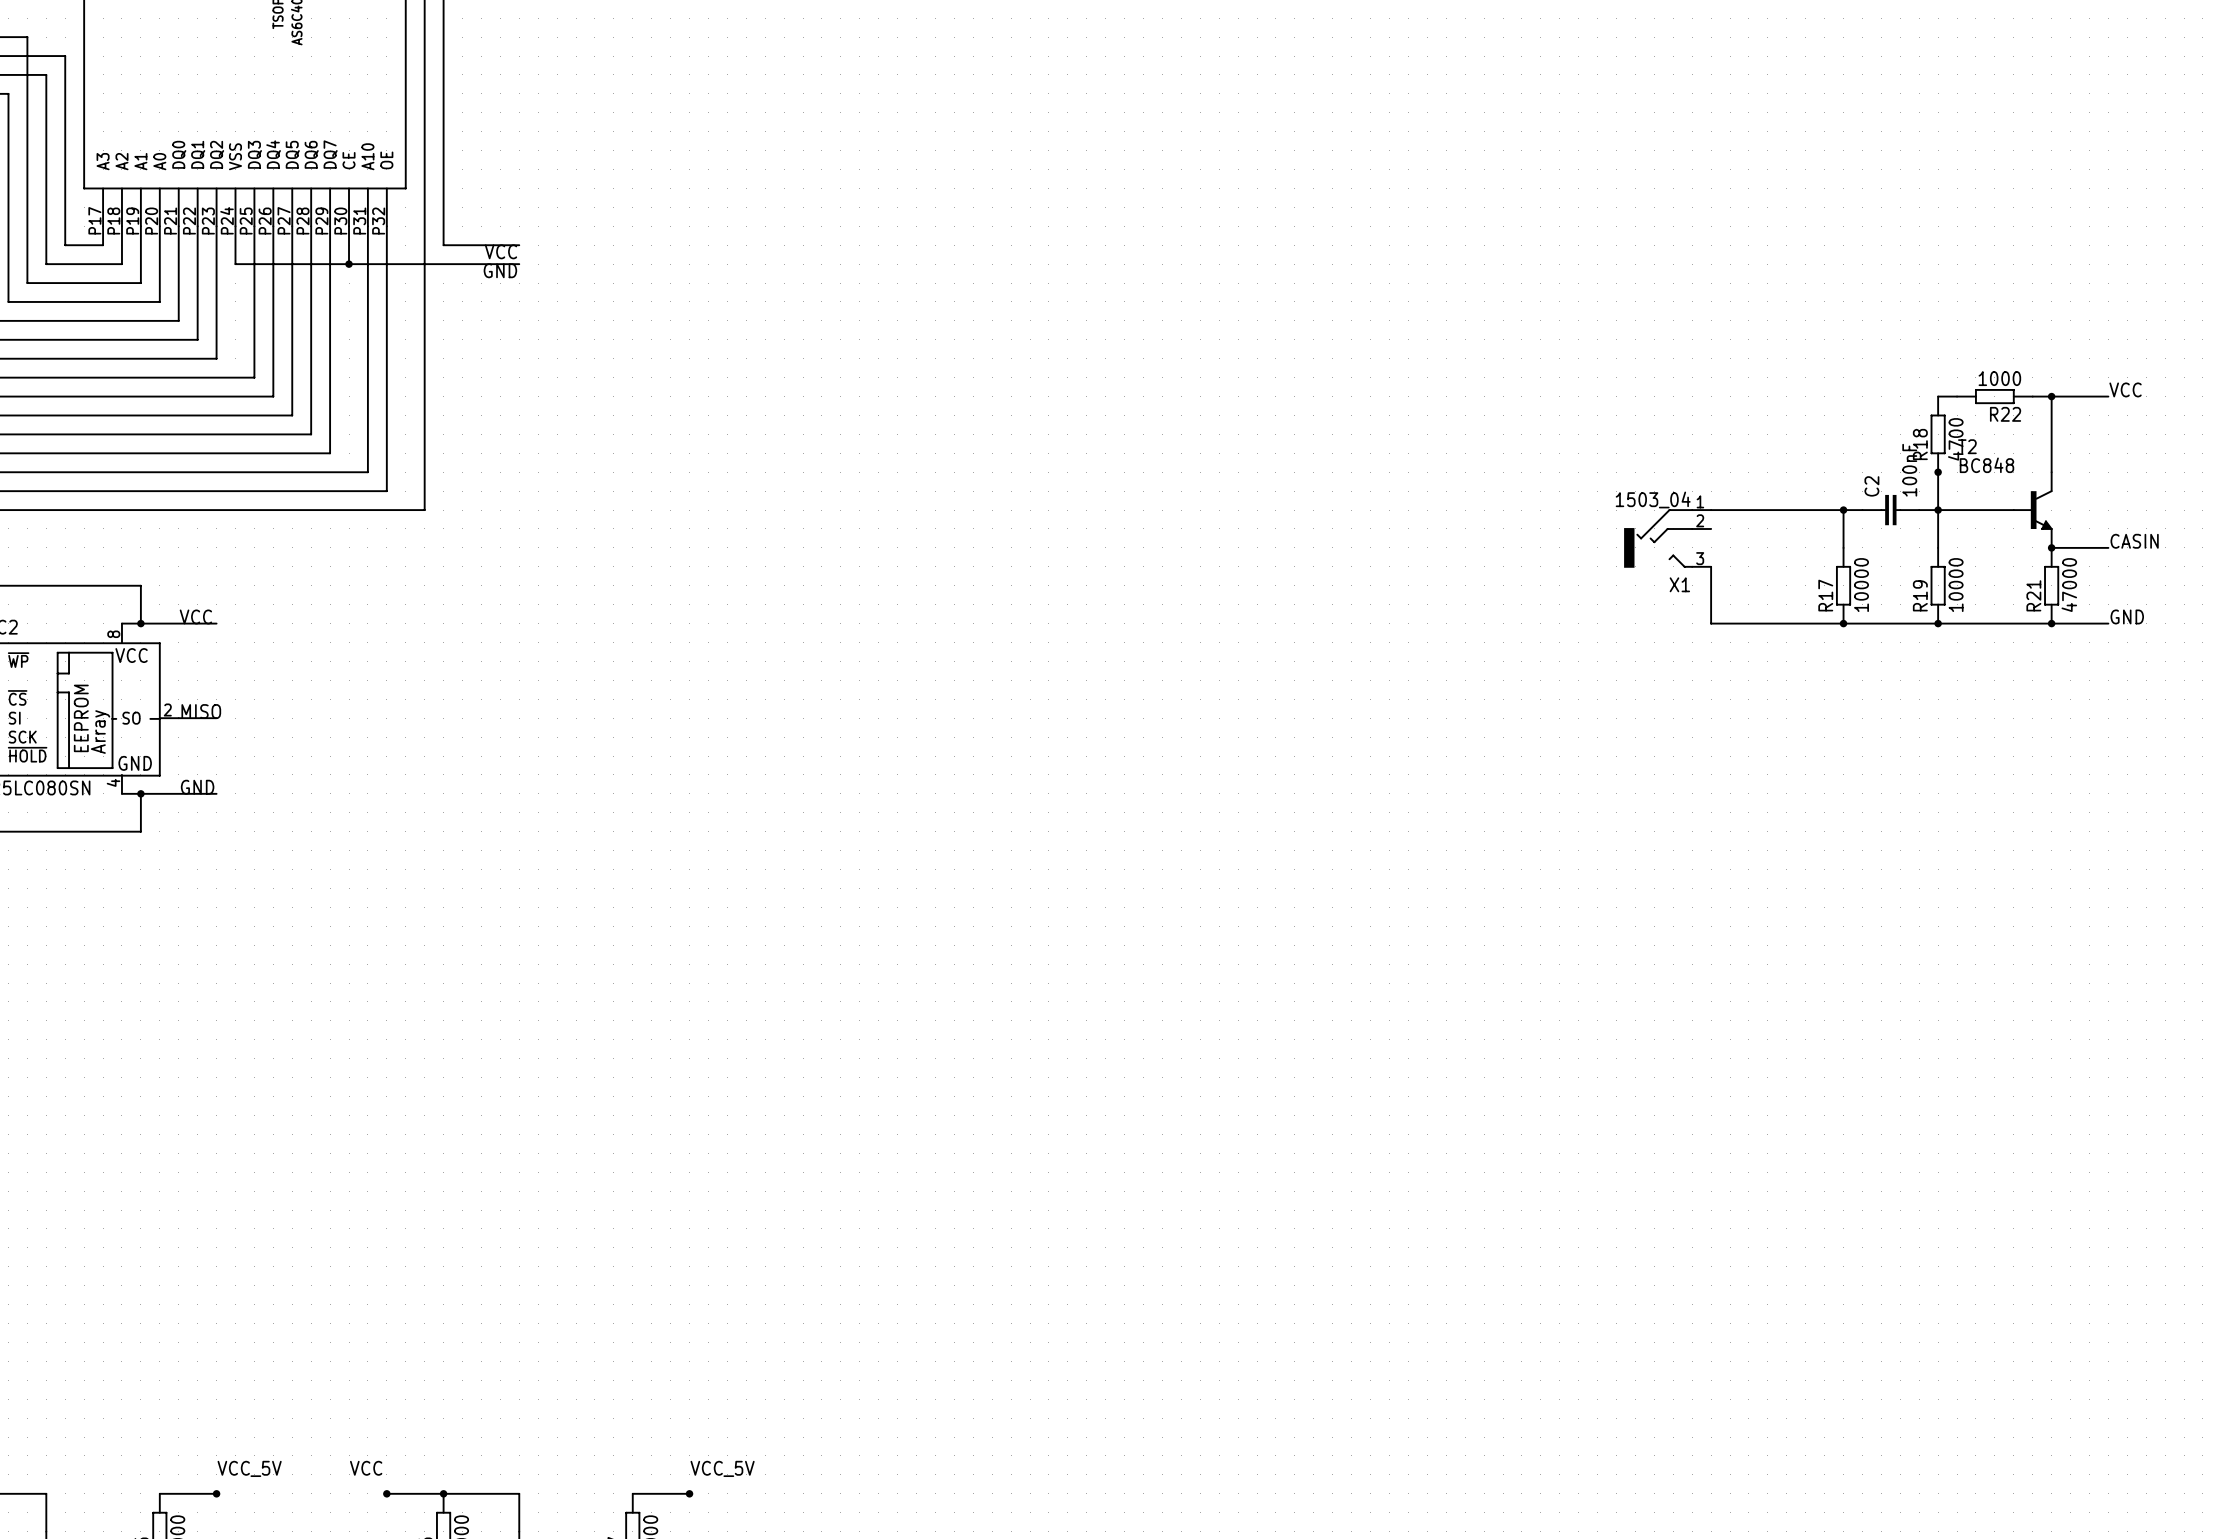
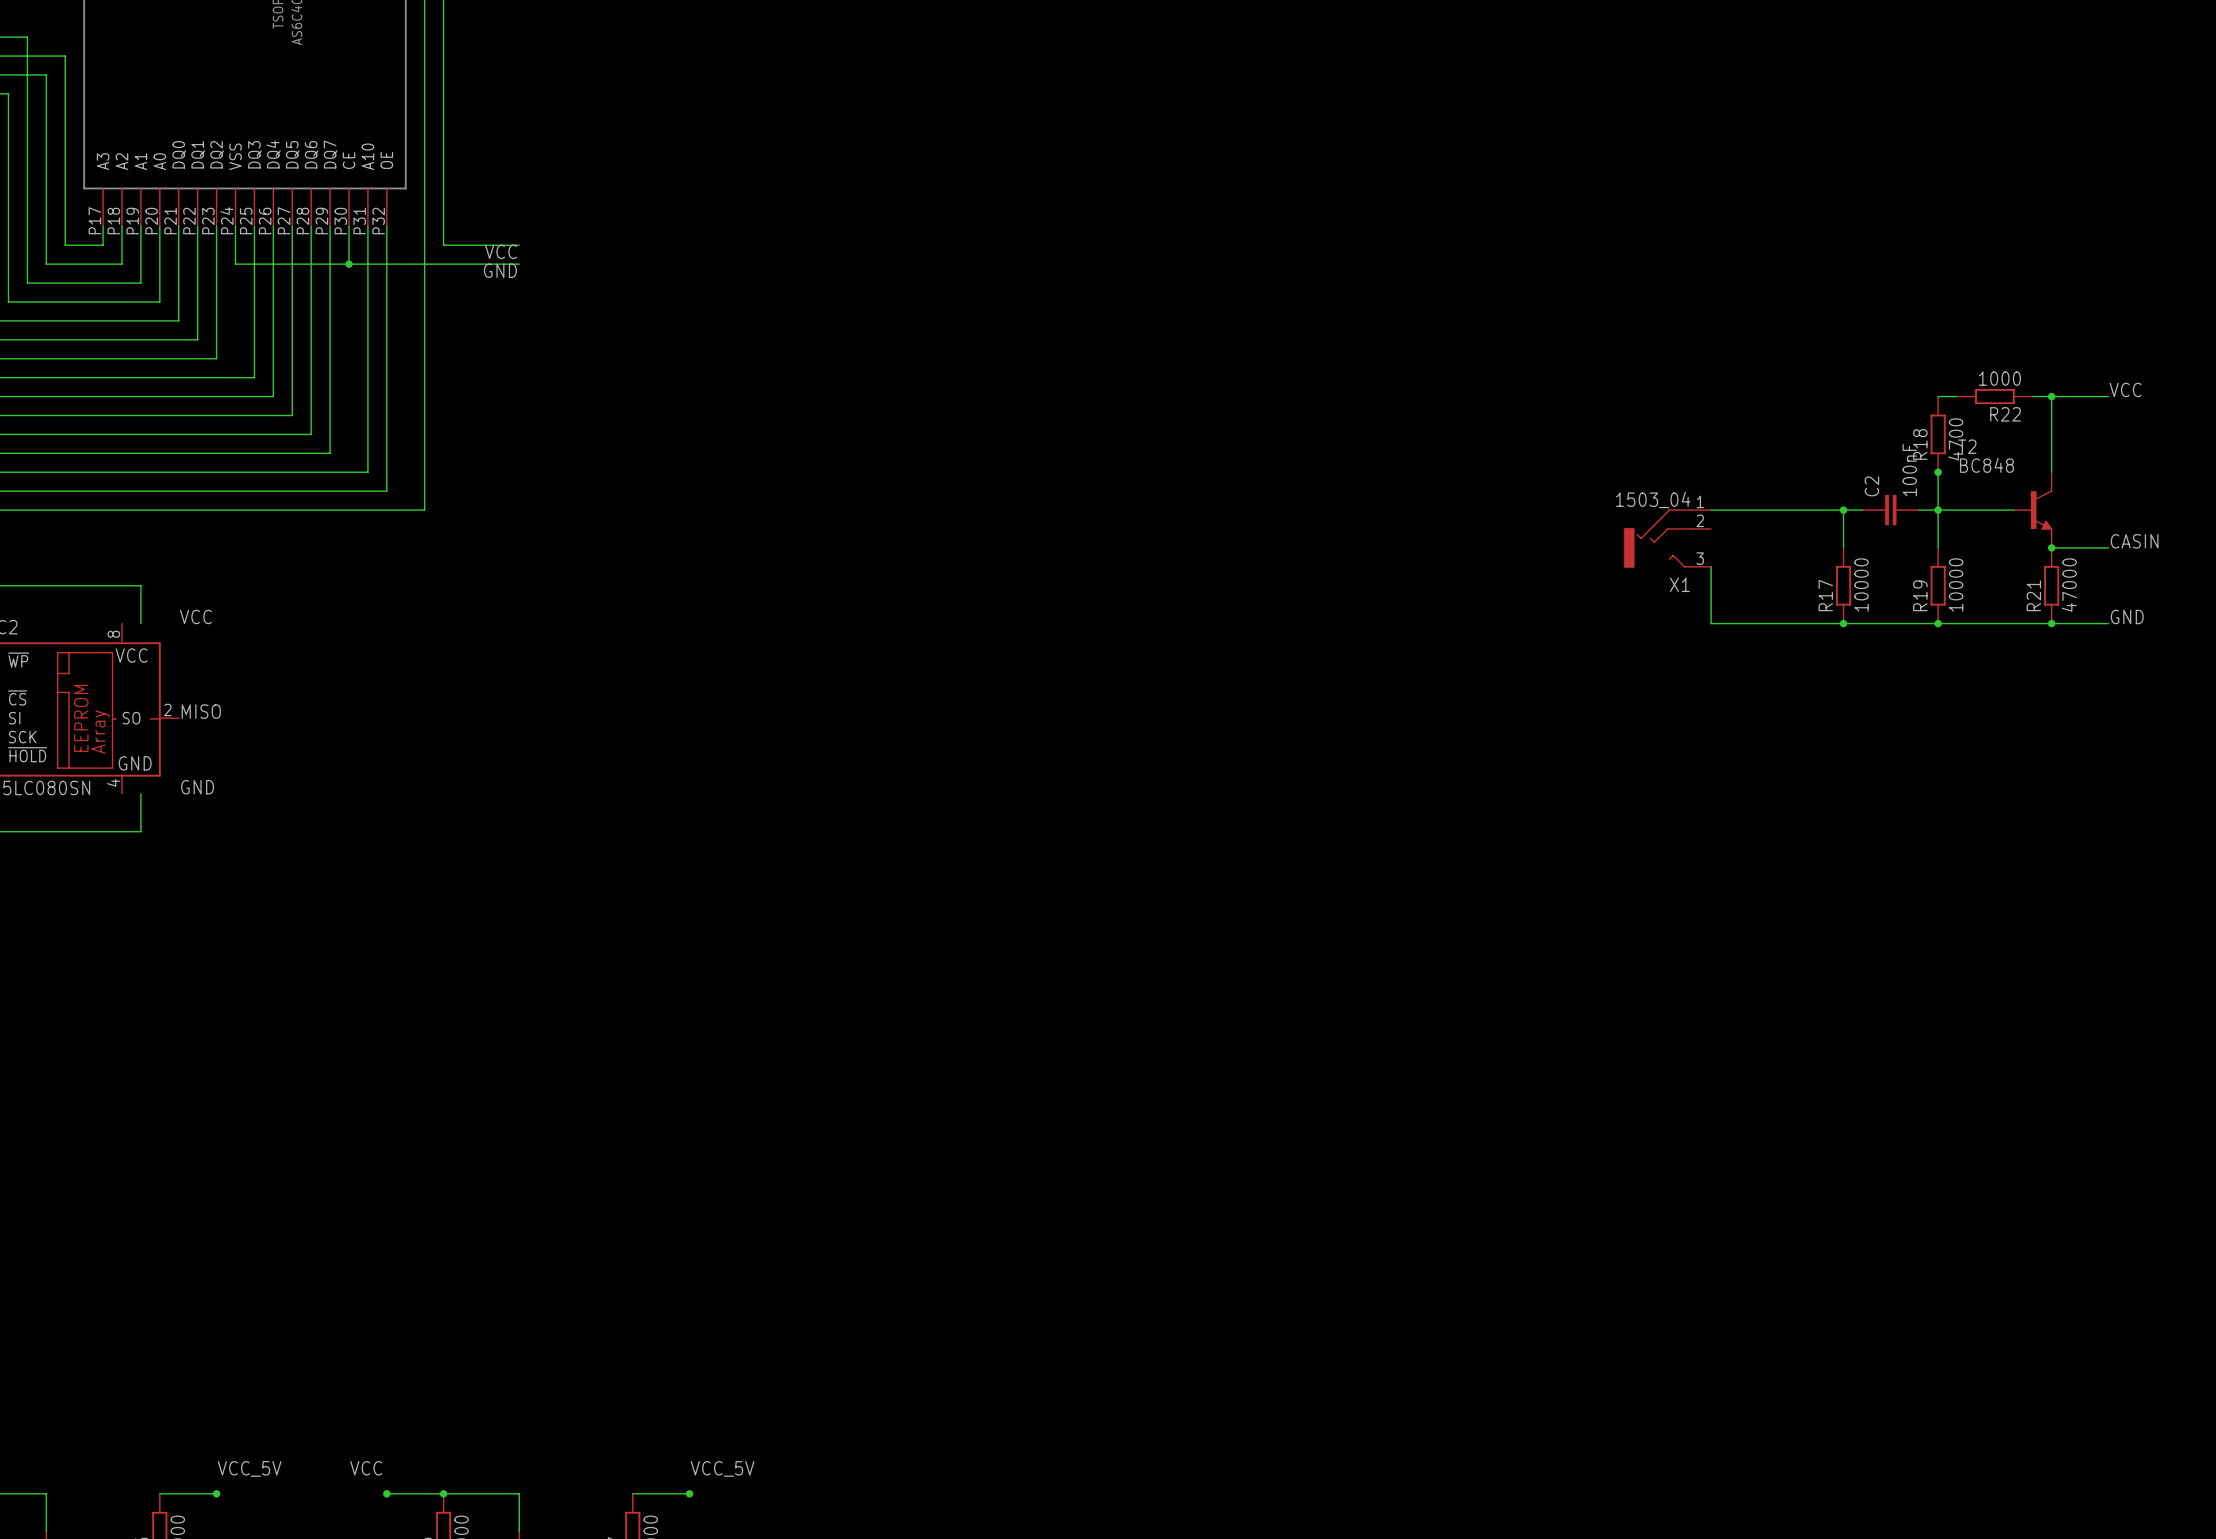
wire: (121, 623) (216, 623) -> none
junction: (140, 623) -> none
wire: (178, 718) (216, 718) -> none
wire: (121, 793) (216, 793) -> none
junction: (140, 793) -> none

